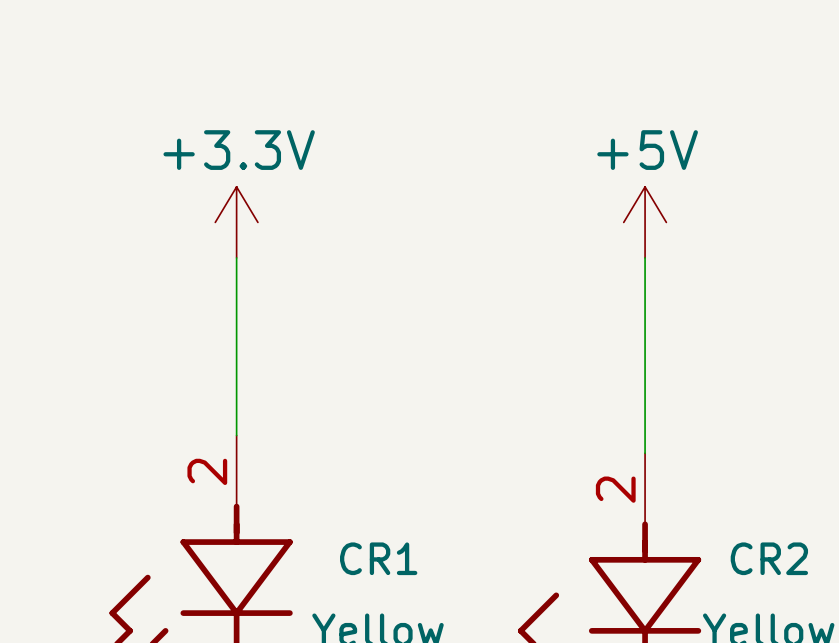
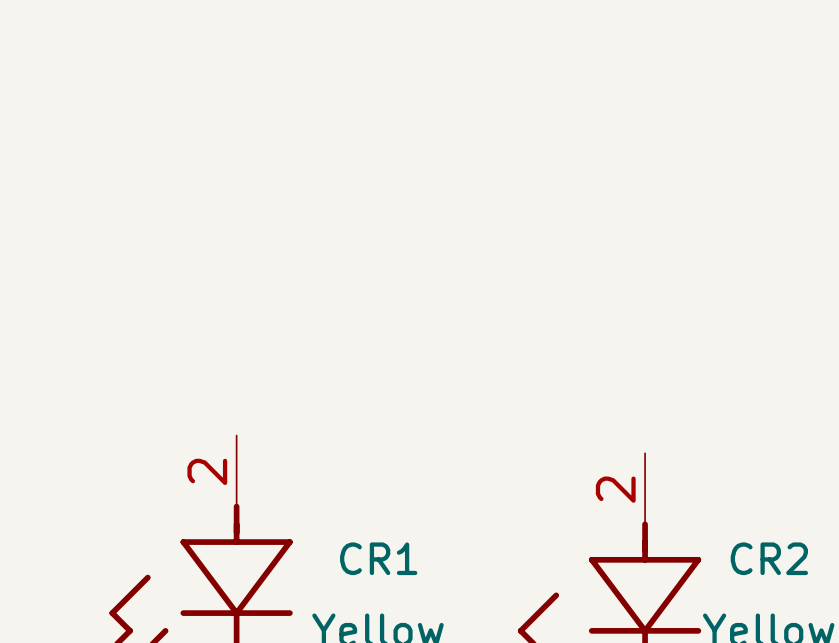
power symbol: +3.3V (236, 222) -> none
power symbol: +5V (645, 222) -> none
wire: (236, 257) (236, 435) -> none
wire: (645, 257) (645, 453) -> none

